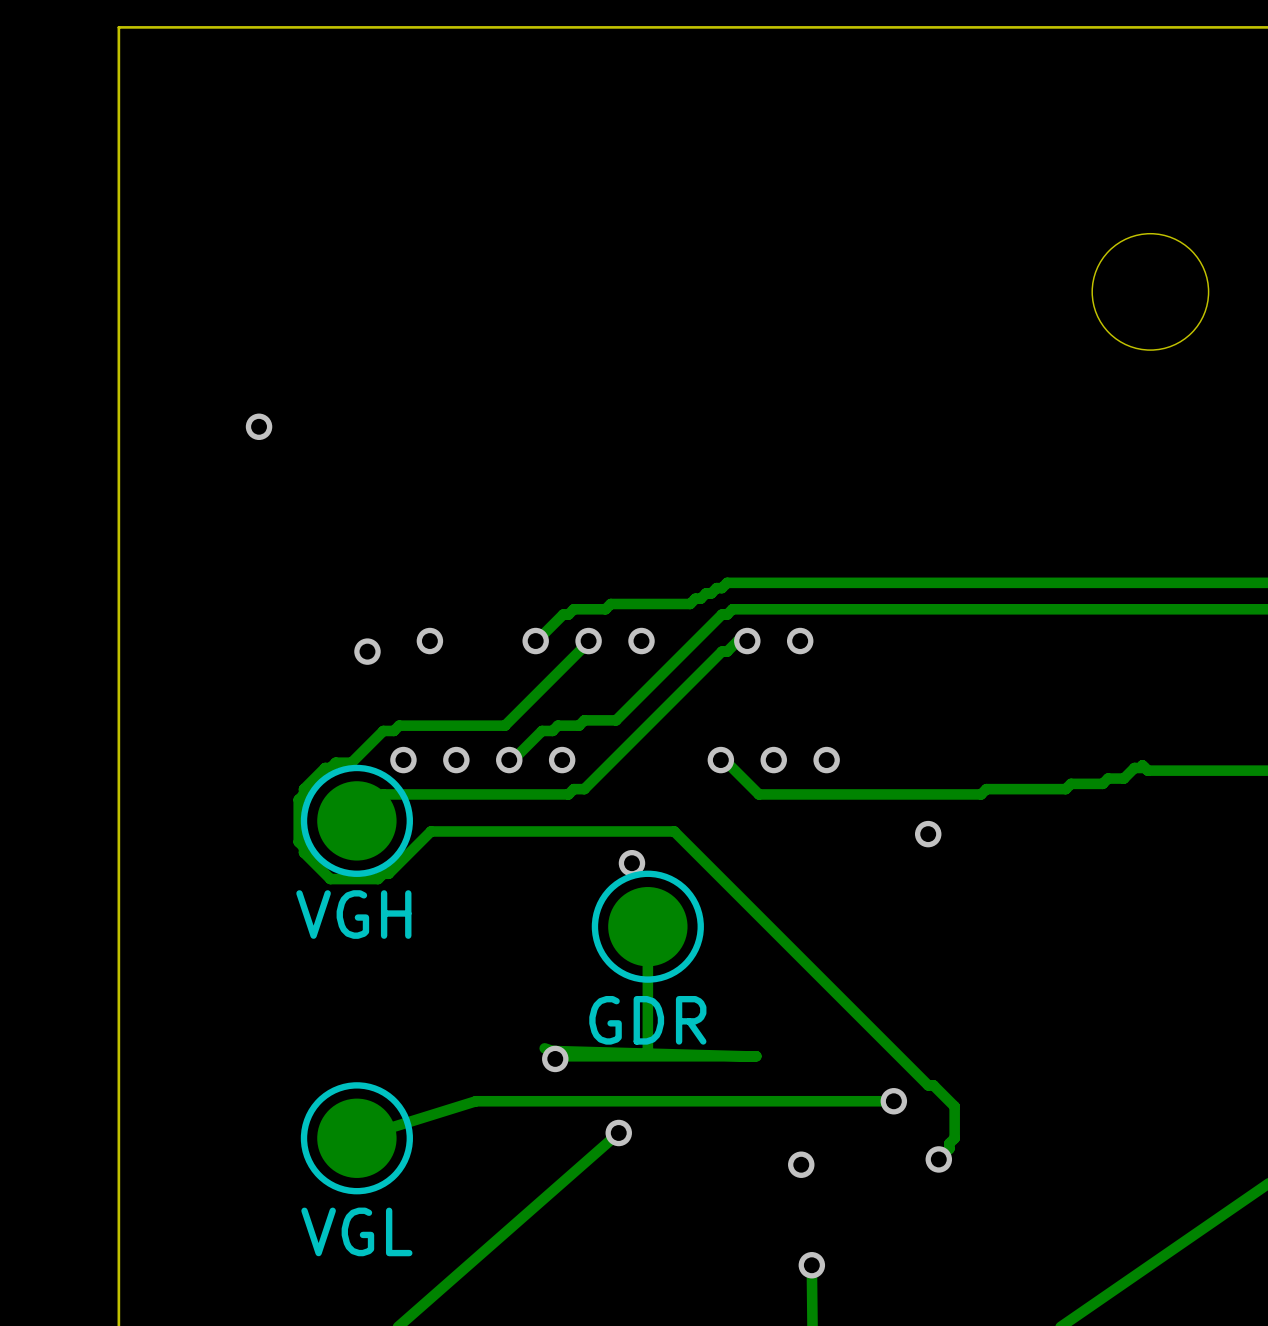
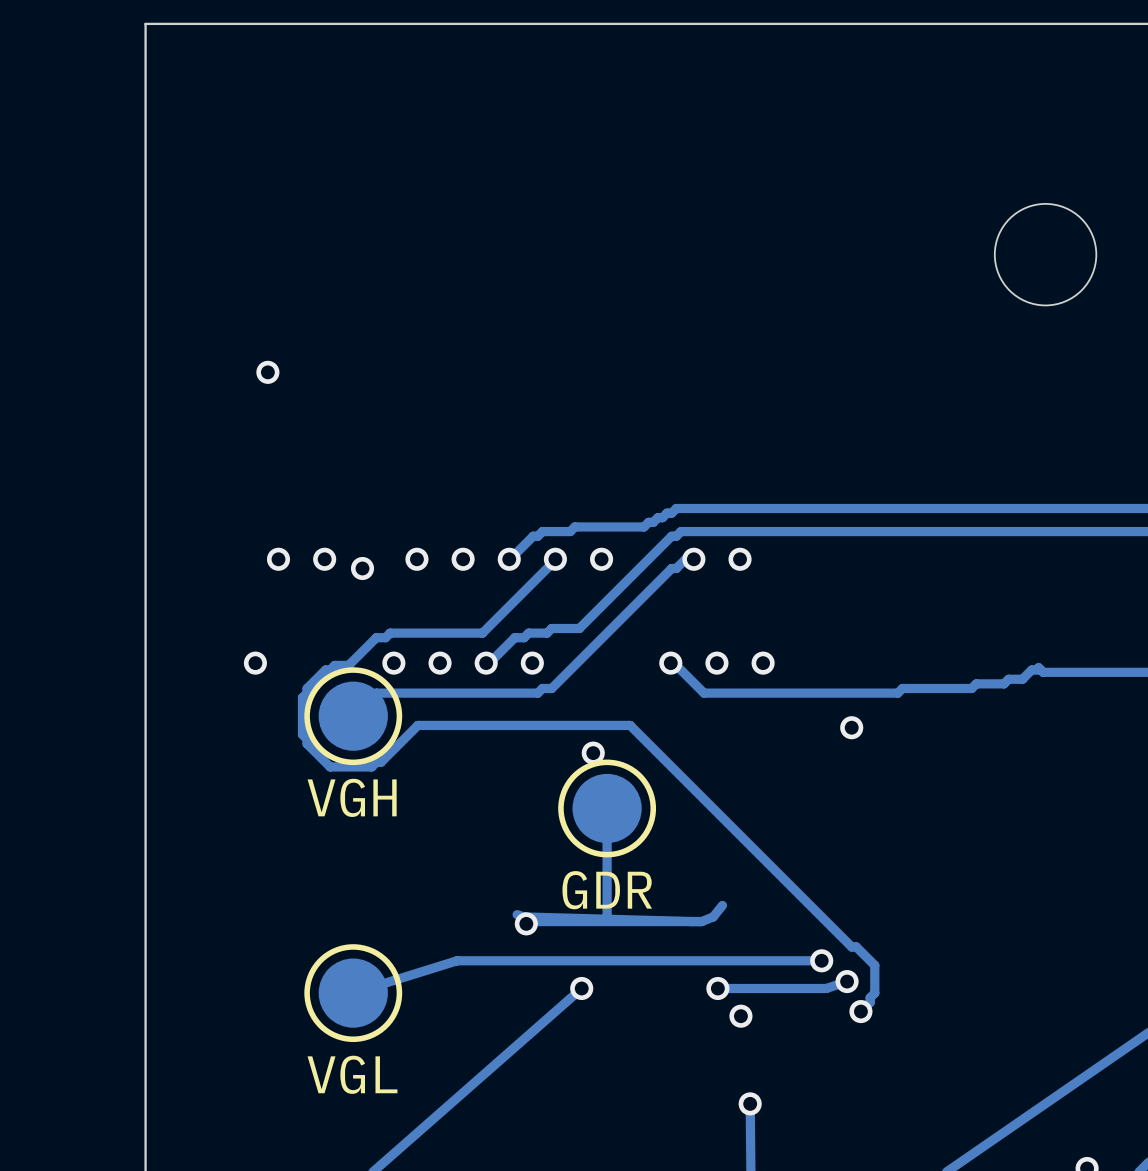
via: none -> (278, 559)
via: none -> (324, 559)
via: none -> (463, 559)
via: none -> (255, 663)
track: none -> (722, 905) (713, 916) (701, 921)
track: none -> (847, 981) (826, 988) (717, 988)
via: none -> (847, 981)
via: none -> (717, 988)

